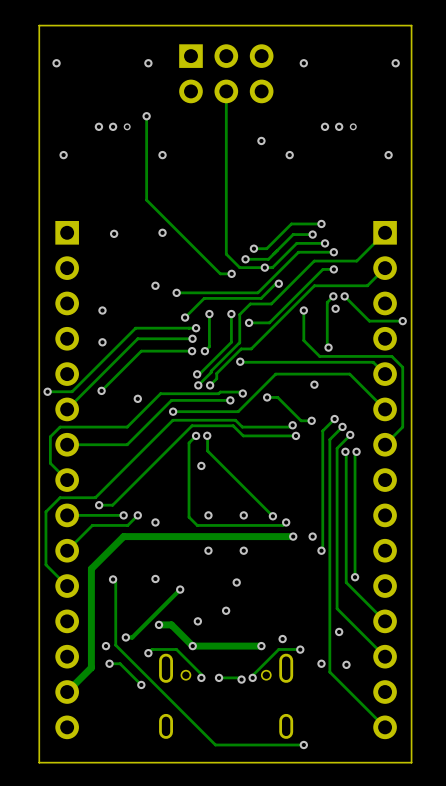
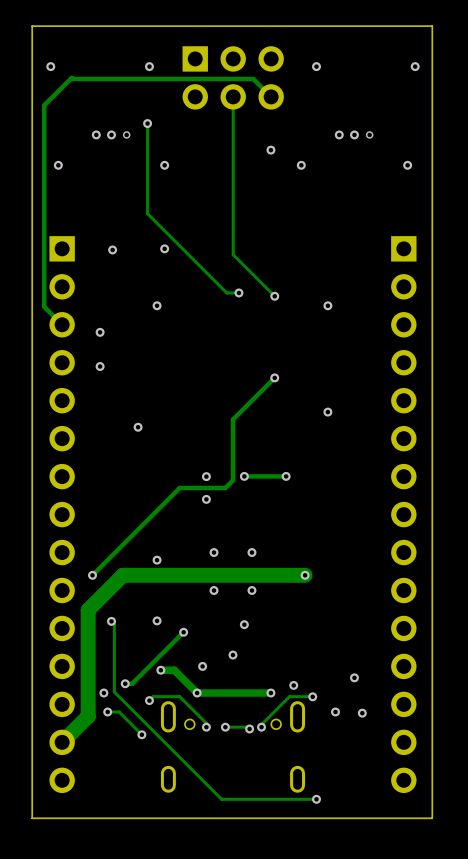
track: none -> (271, 96) (253, 78) (71, 77) (44, 105) (44, 306) (62, 324)
track: (321, 223) (291, 223) (266, 248) (253, 248) -> none
via: (321, 223) -> none
track: (385, 232) (356, 261) (314, 261) (271, 303) (250, 303) (239, 314) (239, 343) -> none
track: (312, 234) (293, 234) (268, 259) (245, 259) -> none
via: (312, 234) -> none
track: (226, 238) (226, 254) (239, 267) (272, 267) (296, 243) (325, 243) -> (233, 254) (274, 296)
via: (325, 243) -> none
via: (253, 248) -> none
track: (333, 252) (298, 252) (257, 292) (176, 292) -> none
via: (333, 252) -> none
via: (245, 259) -> none
via: (264, 267) -> none
track: (385, 268) (367, 285) (314, 285) (251, 348) (241, 348) (216, 373) (216, 378) (210, 385) -> none
track: (333, 269) (322, 269) (269, 322) (249, 322) -> none
via: (333, 269) -> none
via: none -> (274, 296)
track: (278, 283) (275, 283) (261, 298) (204, 298) (185, 317) -> none
via: (278, 283) -> none
via: none -> (327, 305)
via: (176, 292) -> none
track: (333, 296) (327, 302) (328, 347) -> none
via: (333, 296) -> none
track: (344, 296) (369, 321) (402, 321) -> none
via: (344, 296) -> none
via: (335, 308) -> none
track: (303, 310) (303, 340) (319, 356) (391, 356) (402, 367) (402, 427) (385, 444) -> none
via: (303, 310) -> none
track: (209, 314) (209, 346) (204, 351) -> none
via: (209, 314) -> none
track: (231, 314) (231, 342) (199, 374) (197, 374) -> none
via: (231, 314) -> none
via: (185, 317) -> none
via: (402, 321) -> none
via: (249, 322) -> none
track: (196, 328) (135, 328) (72, 391) (47, 391) -> none
via: (196, 328) -> none
track: (192, 338) (137, 338) (67, 409) -> none
via: (192, 338) -> none
track: (238, 343) (198, 385) -> none
via: (328, 347) -> none
track: (192, 351) (141, 351) (101, 390) -> none
via: (192, 351) -> none
via: (204, 351) -> none
track: none -> (274, 377) (232, 419) (232, 480) (225, 488) (179, 488) (92, 575)
via: none -> (274, 377)
track: (240, 361) (373, 362) (385, 374) -> none
via: (240, 361) -> none
via: (197, 374) -> none
via: (198, 385) -> none
via: (210, 385) -> none
via: (101, 390) -> none
via: (47, 391) -> none
track: (242, 393) (220, 392) (218, 393) (160, 393) (127, 427) (60, 427) (50, 436) (50, 463) (67, 480) -> none
via: (242, 393) -> none
track: (267, 397) (277, 397) (301, 420) (311, 420) -> none
via: (267, 397) -> none
track: (230, 400) (171, 400) (127, 444) (67, 444) -> none
via: (230, 400) -> none
track: (385, 409) (349, 374) (275, 374) (238, 411) (173, 411) -> none
via: (173, 411) -> none
track: (334, 419) (322, 430) (321, 550) -> none
via: (334, 419) -> none
via: (311, 420) -> none
track: (292, 425) (290, 427) (242, 427) (235, 420) (172, 420) (95, 497) (60, 497) (45, 511) (45, 564) (67, 586) -> none
via: (292, 425) -> none
track: (342, 426) (329, 439) (329, 672) (385, 727) -> none
via: (342, 426) -> none
track: (350, 434) (337, 448) (337, 608) (385, 656) -> none
via: (350, 434) -> none
track: (196, 435) (189, 442) (189, 517) (197, 525) (283, 525) (286, 522) -> none
via: (196, 435) -> none
track: (207, 435) (207, 450) (272, 516) -> none
via: (207, 435) -> none
track: (295, 435) (243, 435) (233, 425) (192, 425) (112, 505) (99, 505) -> none
via: (295, 435) -> none
via: none -> (206, 476)
via: none -> (244, 476)
track: none -> (286, 476) (244, 476)
via: none -> (286, 476)
track: (345, 451) (346, 582) (385, 621) -> none
via: (345, 451) -> none
track: (356, 451) (355, 577) -> none
via: (356, 451) -> none
via: (99, 505) -> none
track: (123, 515) (67, 515) -> none
via: (123, 515) -> none
track: (137, 515) (127, 525) (92, 525) (67, 550) -> none
via: (137, 515) -> none
via: (272, 516) -> none
via: (286, 522) -> none
via: none -> (92, 575)
track width: thin (293, 536) (123, 536) (91, 568) (91, 667) (67, 692) -> thick (305, 575) (122, 575) (88, 609) (88, 716) (62, 742)
via: (312, 536) -> none
via: (321, 550) -> none
via: (355, 577) -> none

